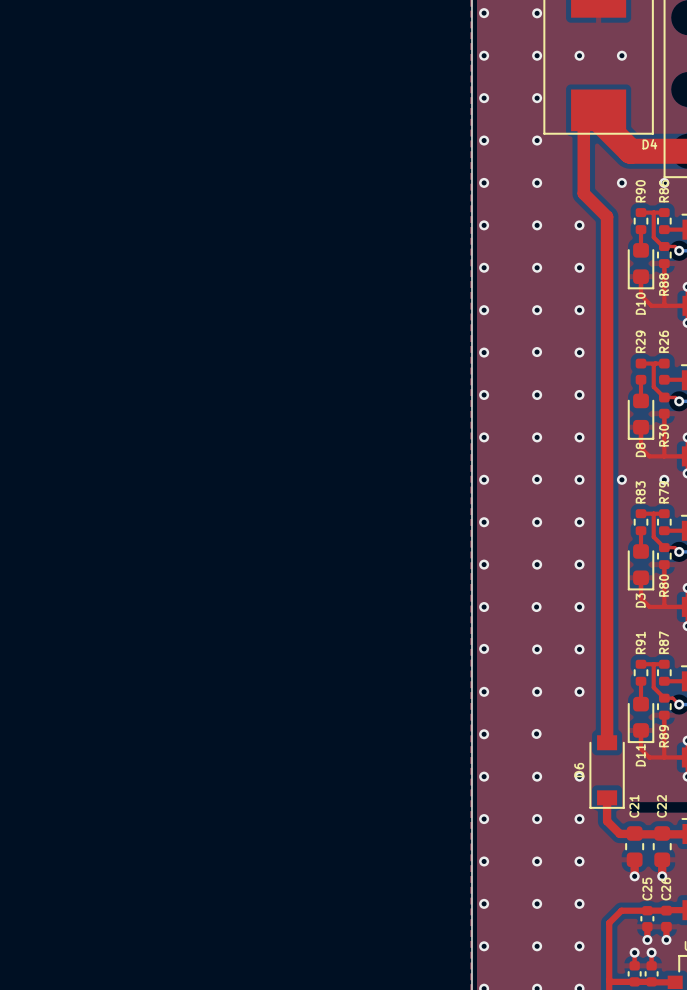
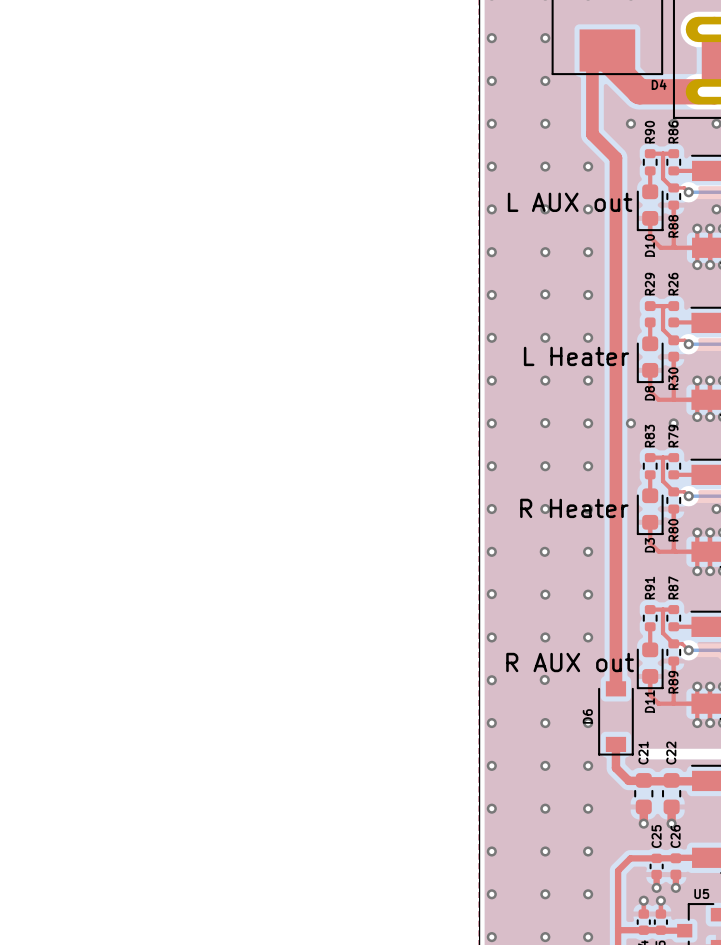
text: none -> L AUX out (570, 202)
text: none -> L Heater (576, 356)
text: none -> R Heater (574, 508)
text: none -> R AUX out (570, 662)

